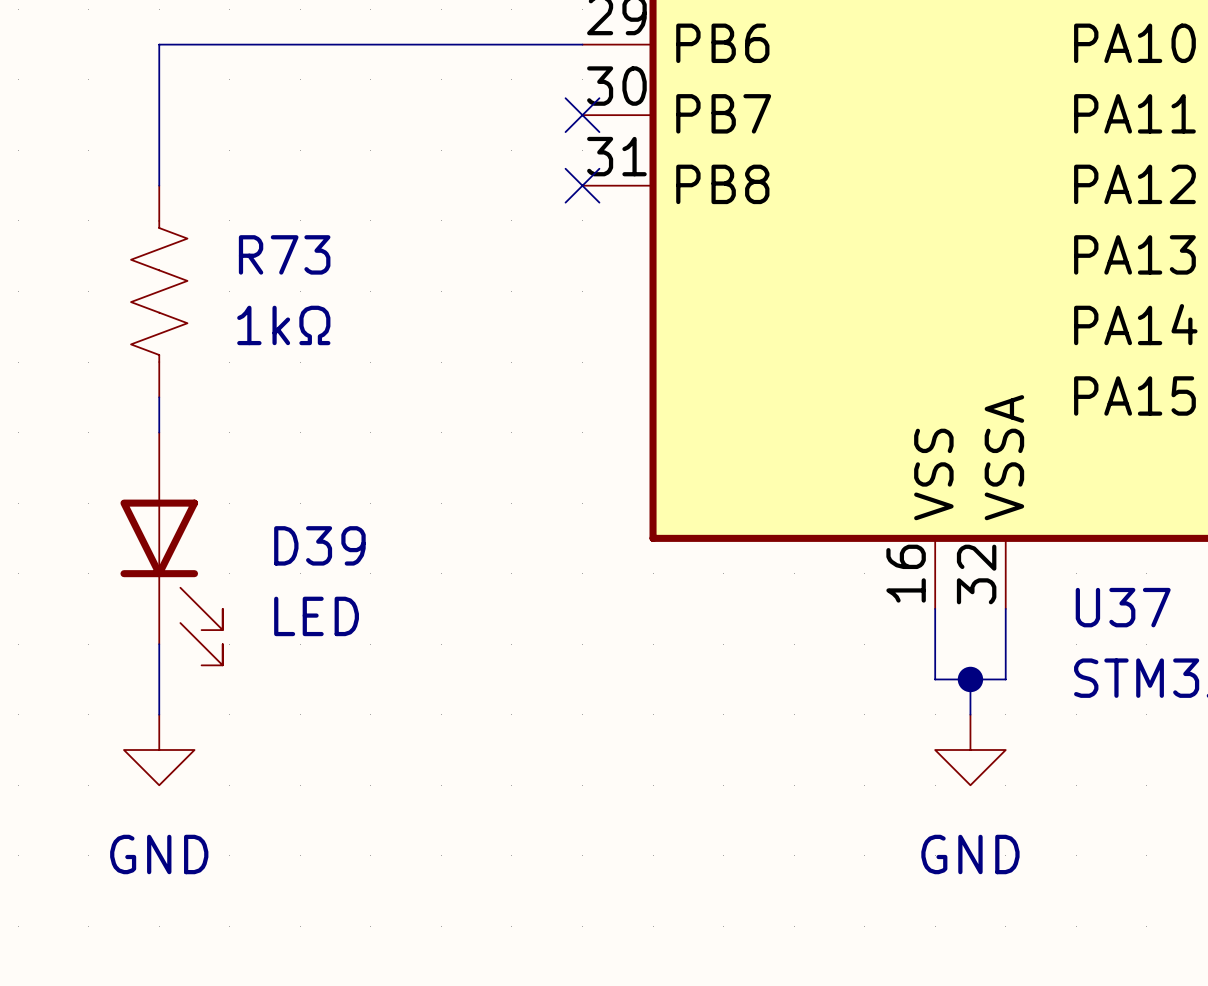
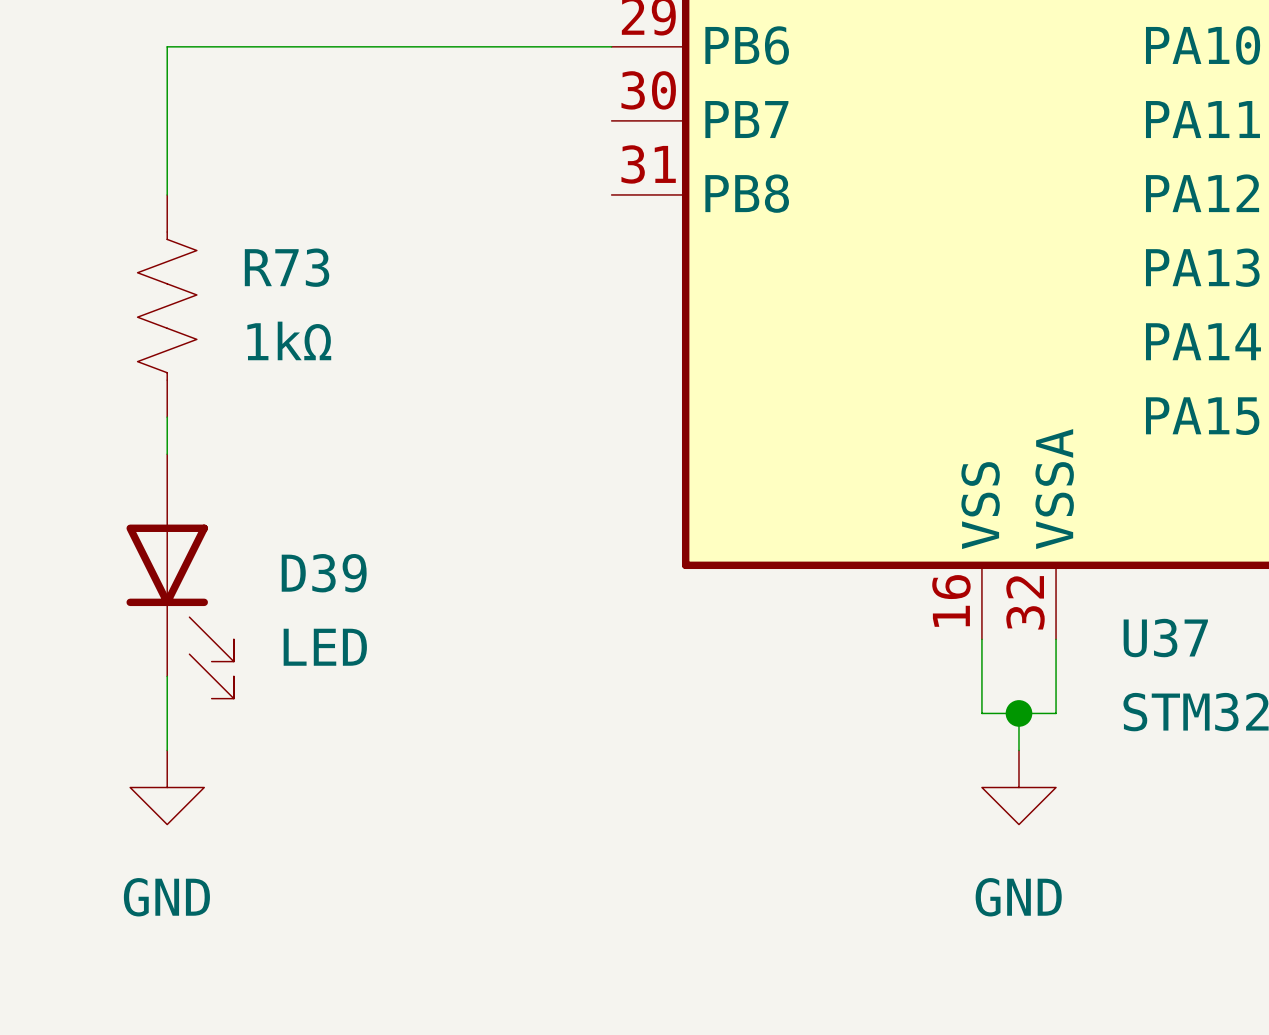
no-connect mark: (582, 115) -> none
no-connect mark: (582, 185) -> none

